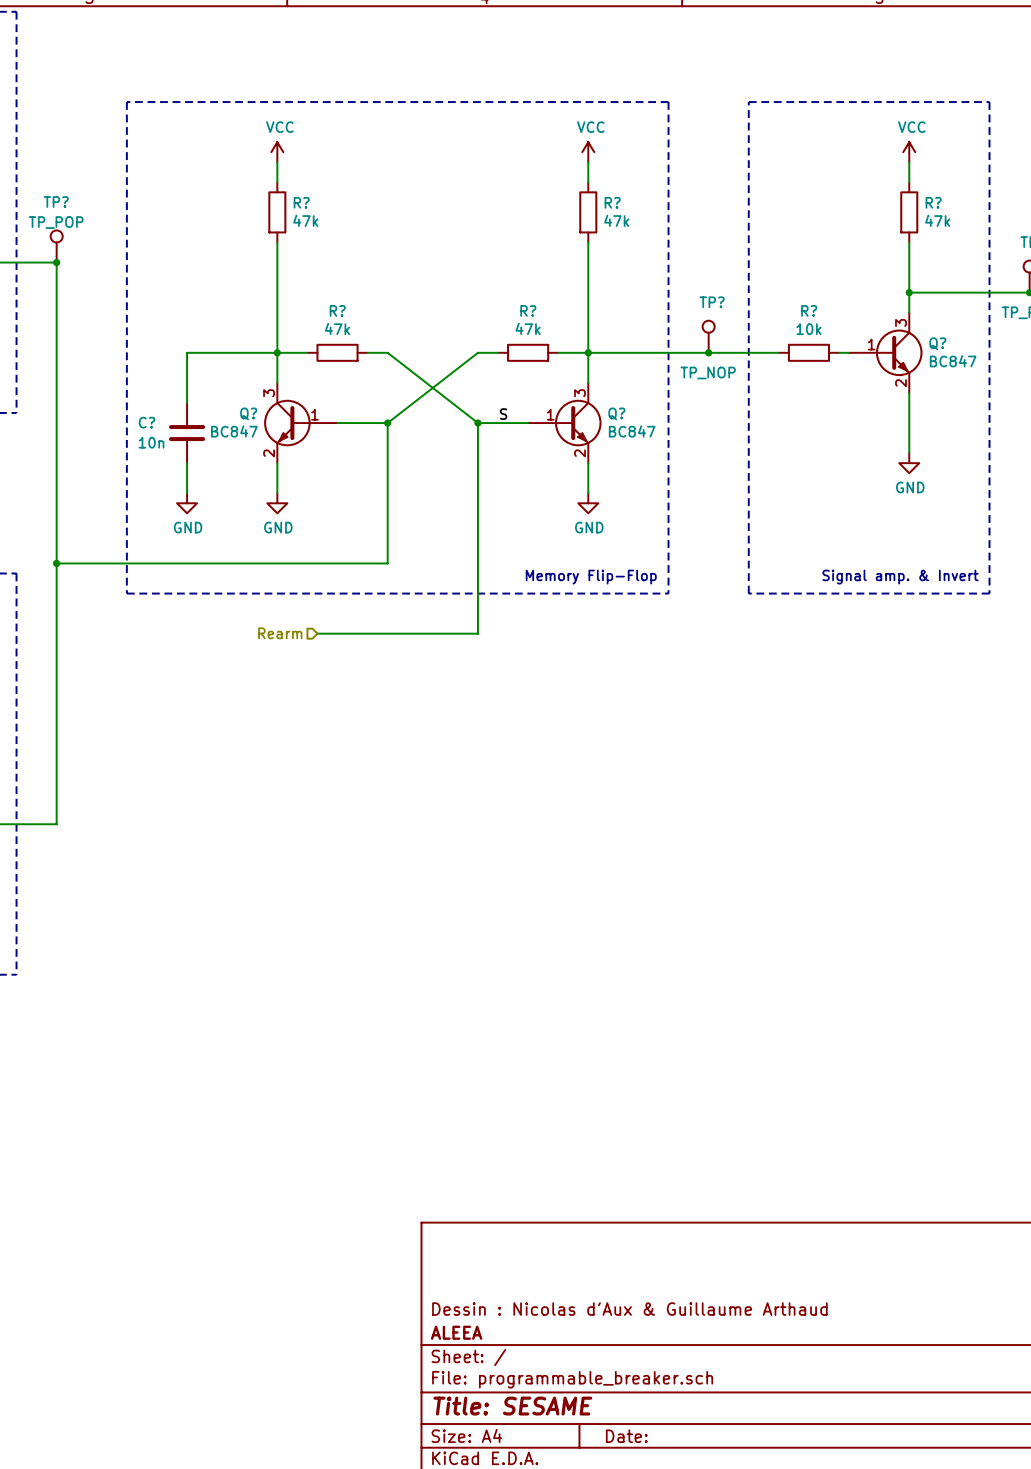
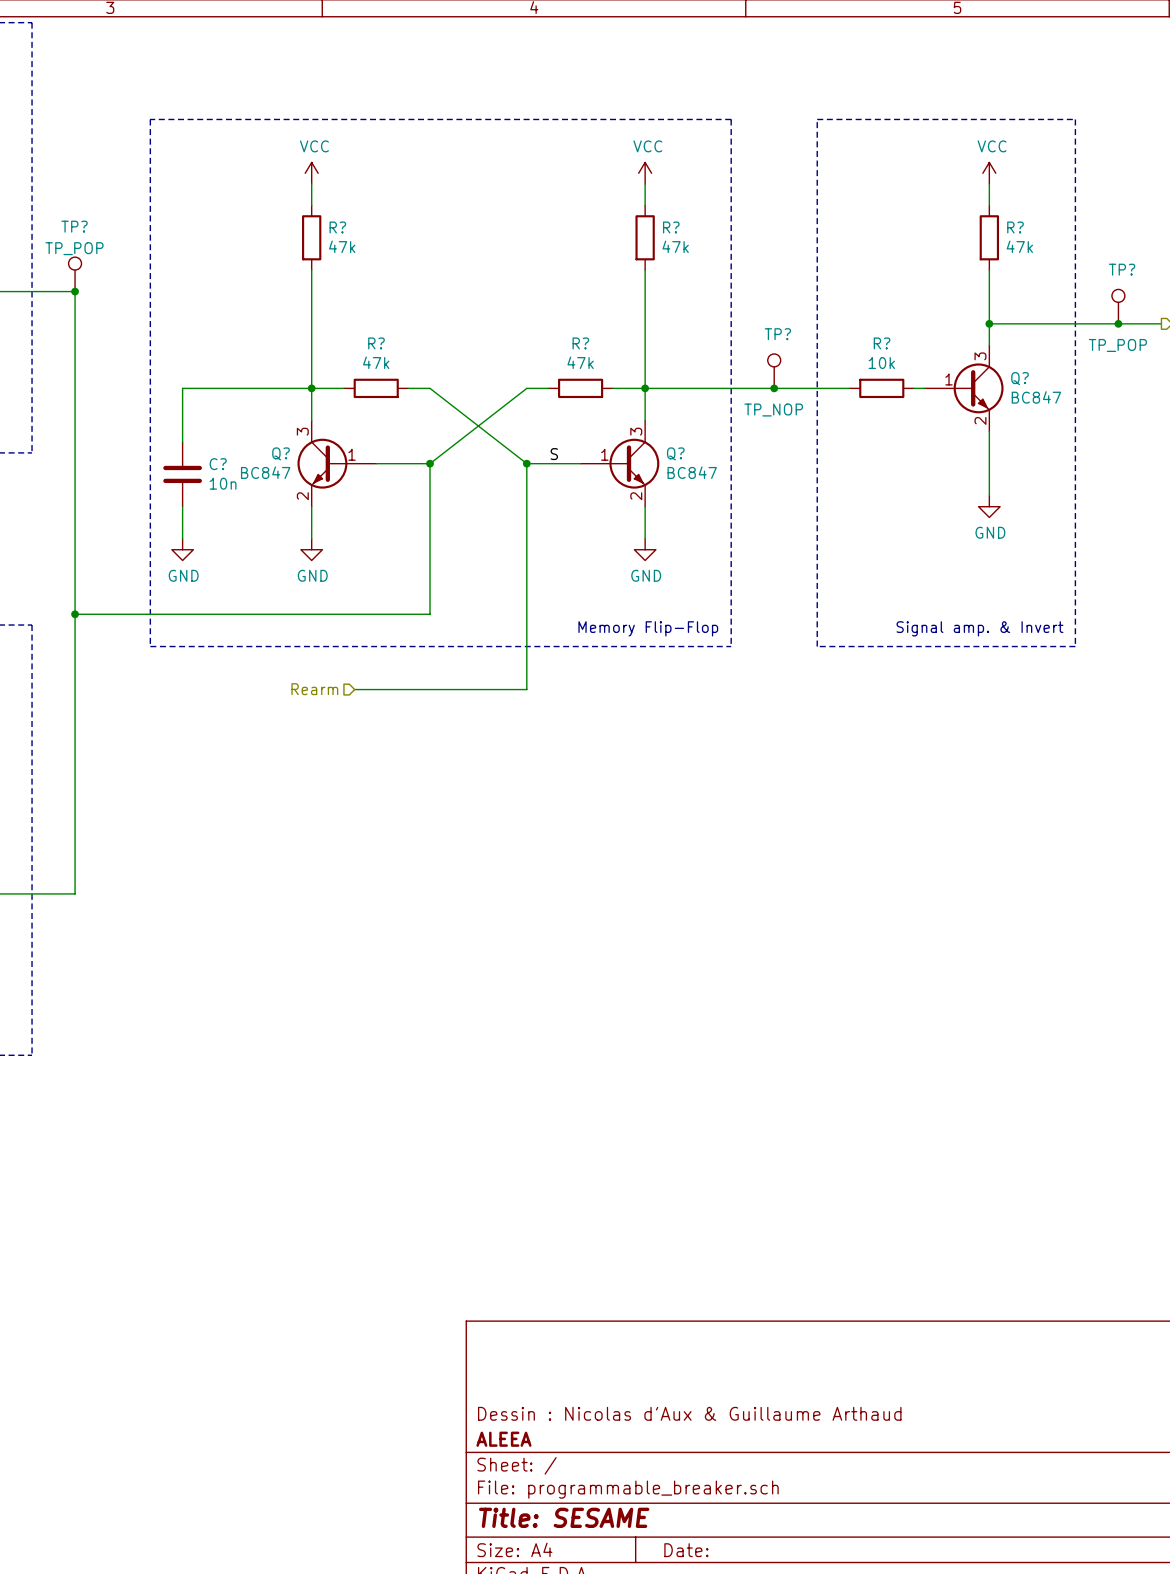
wire: (187, 352) (187, 402) -> (214, 388) (182, 388) (182, 442)
C? name position: C? (147, 422) -> C? (218, 464)
C? position: (187, 433) -> (182, 474)
C? value position: 10n (151, 442) -> 10n (223, 483)
wire: (187, 463) (187, 493) -> (182, 506) (182, 538)
power symbol position: GND (187, 503) -> GND (182, 549)

